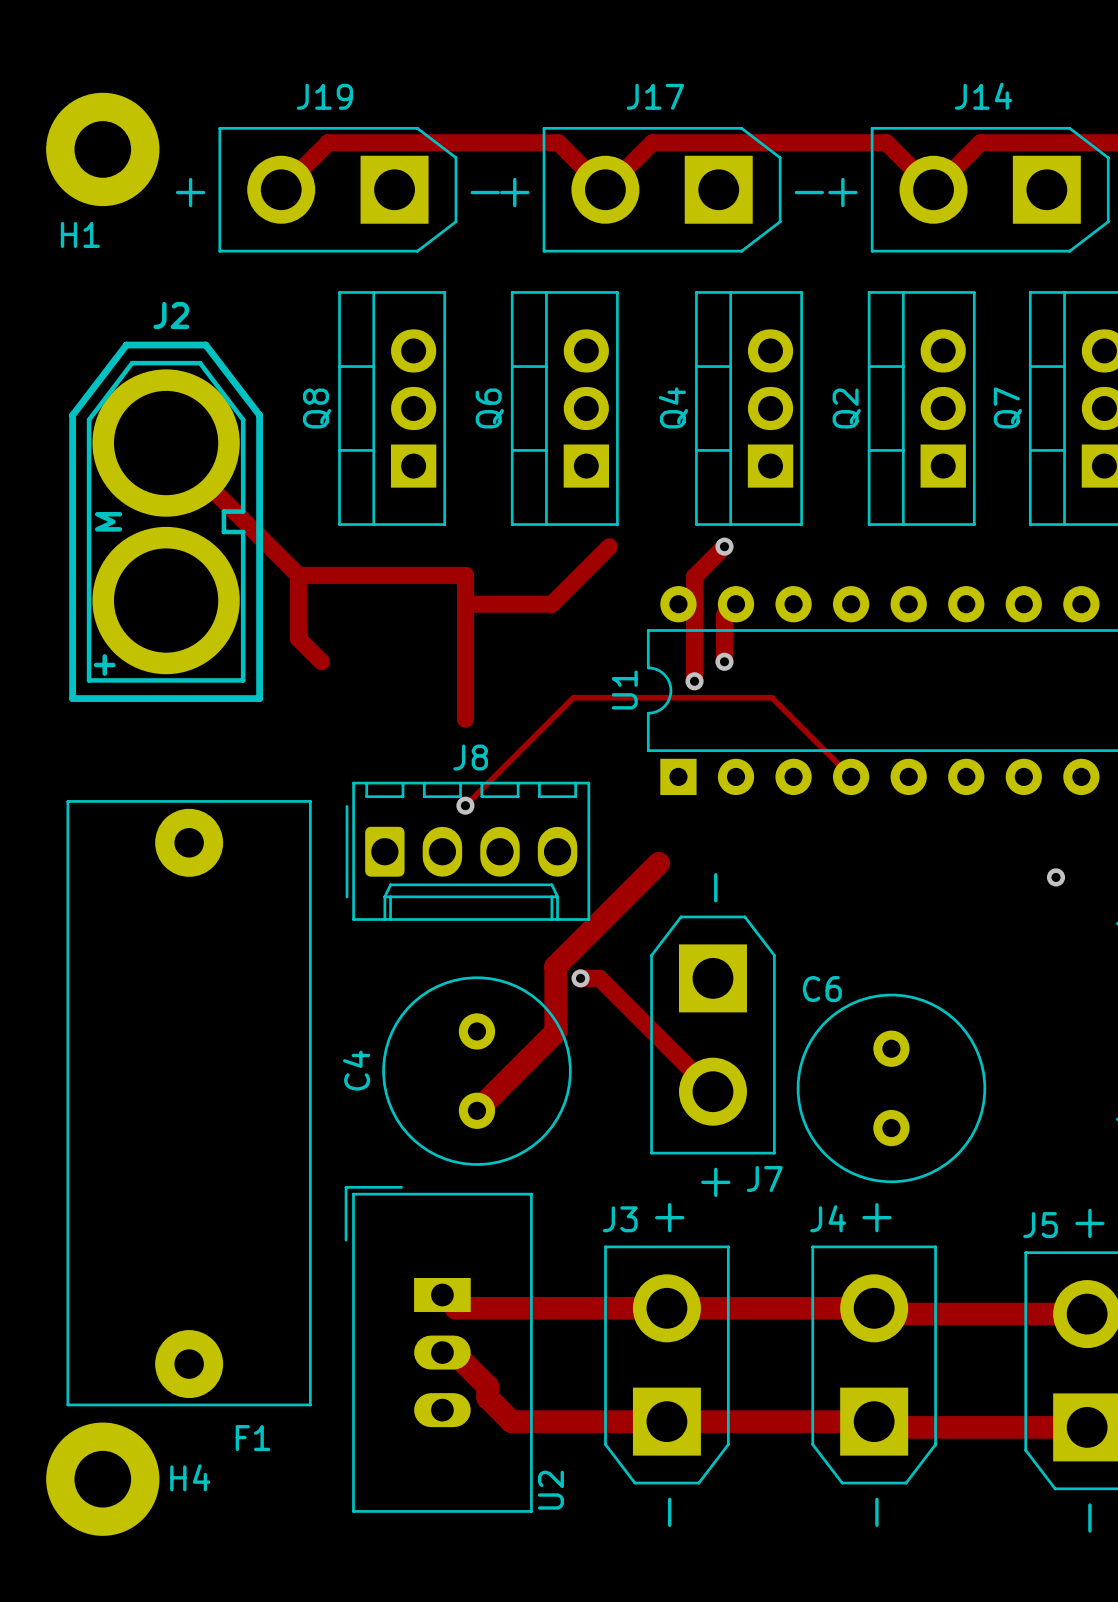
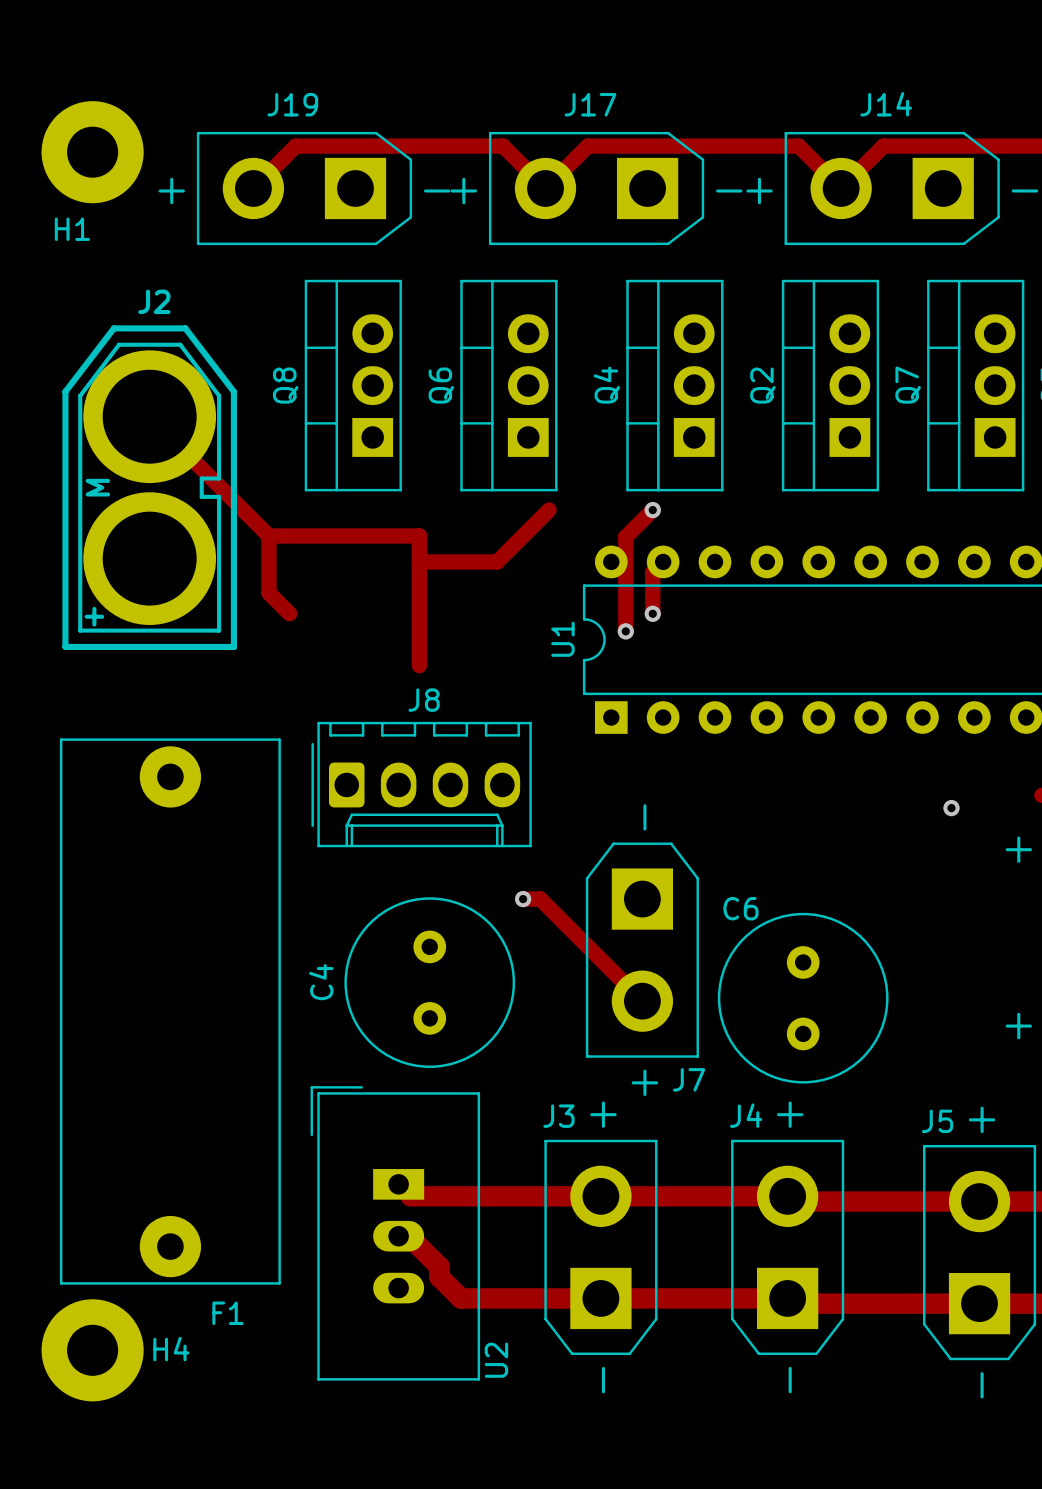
track: (851, 776) (771, 697) (573, 697) (465, 805) -> none
via: (465, 805) -> none
track: (658, 863) (555, 966) (555, 1032) (476, 1110) -> none

